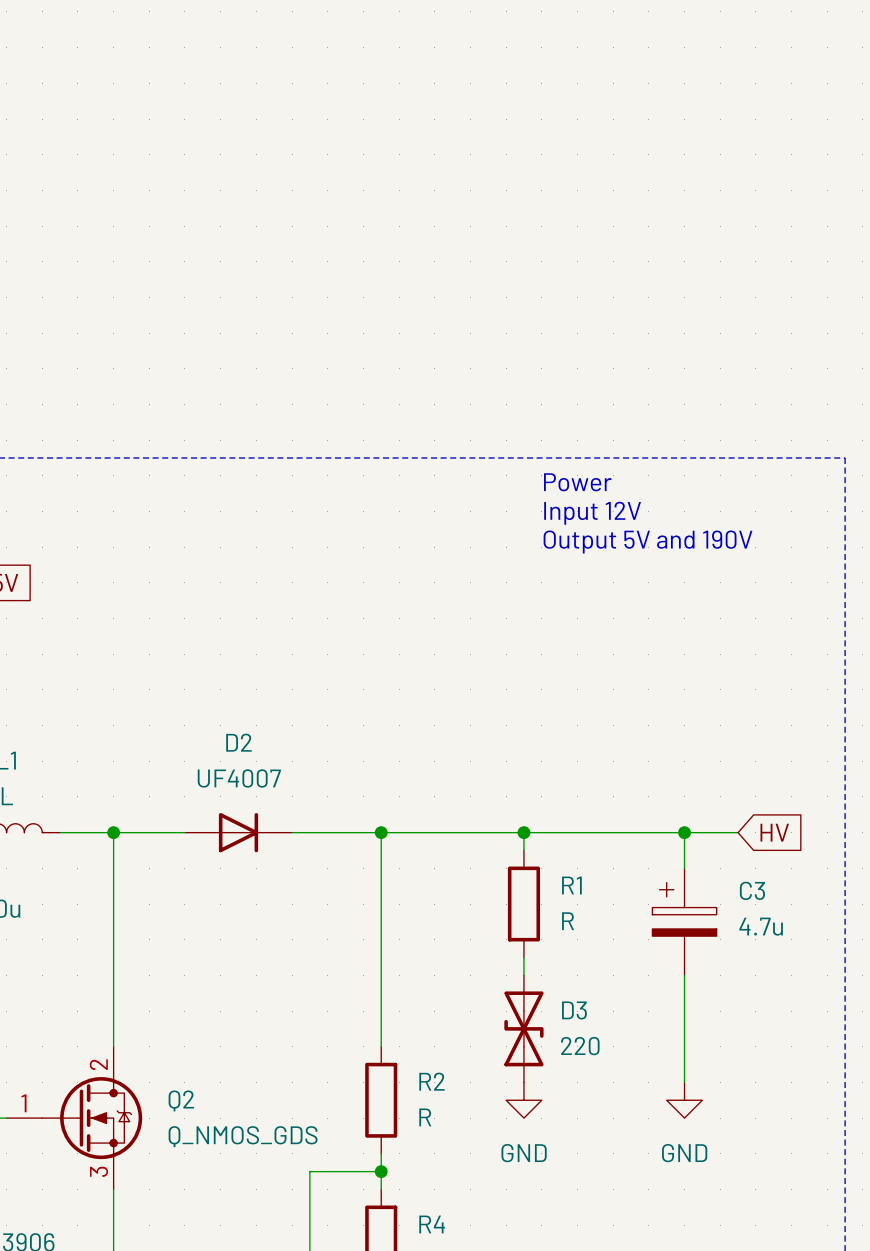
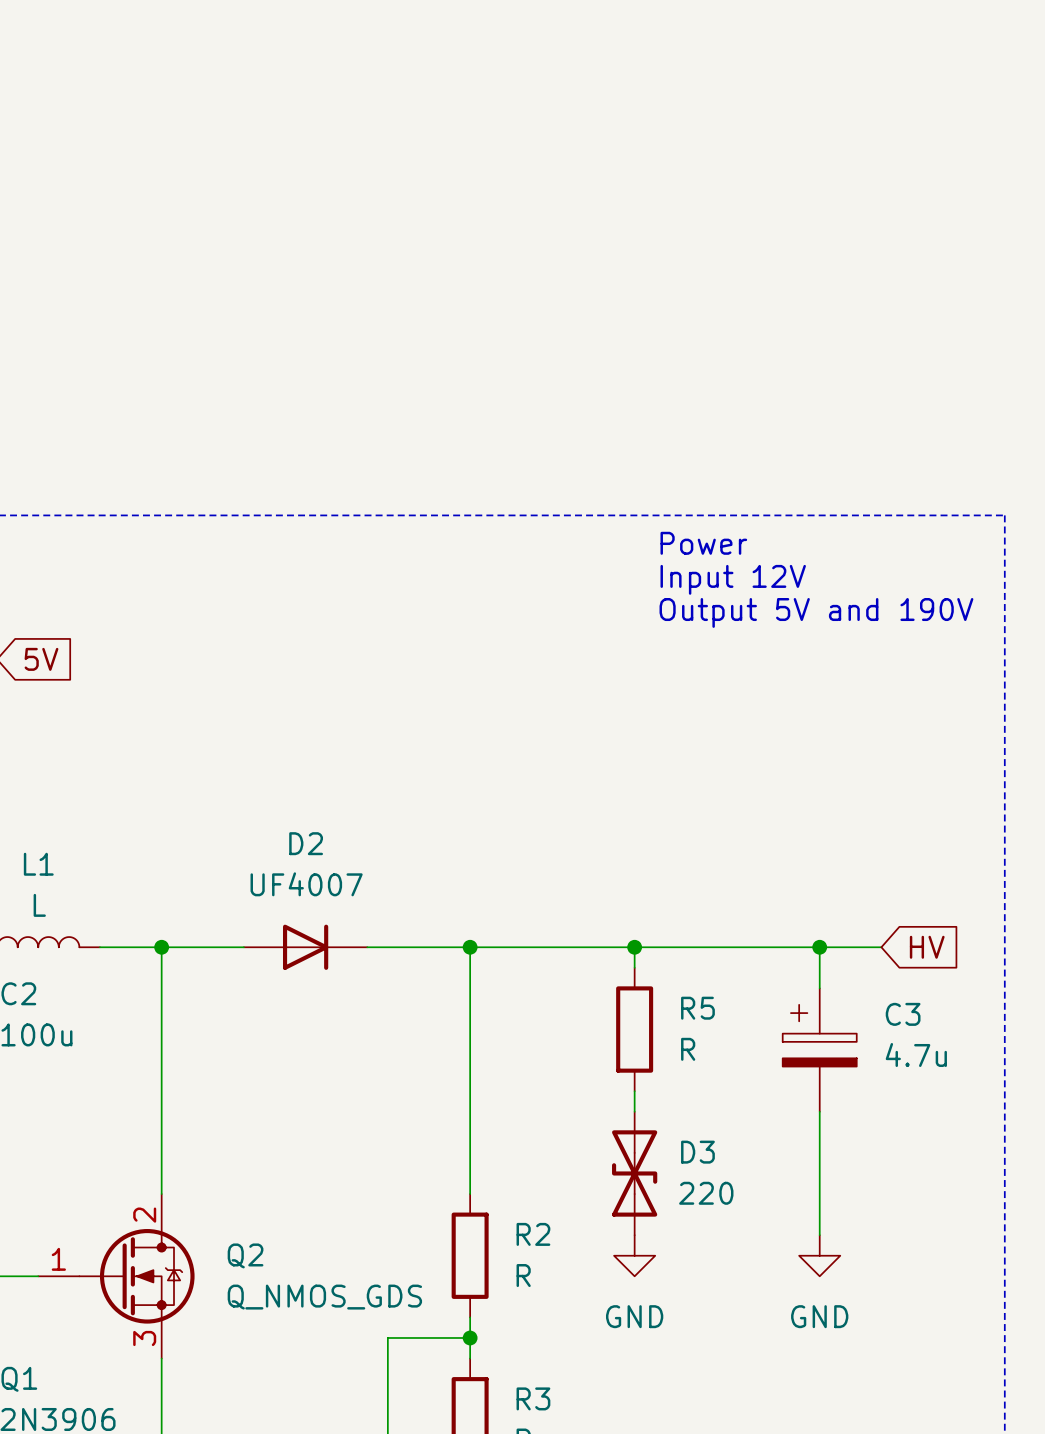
R1 name: R1 (571, 885) -> R5 (697, 1008)
R4 name: R4 (432, 1224) -> R3 (533, 1398)

